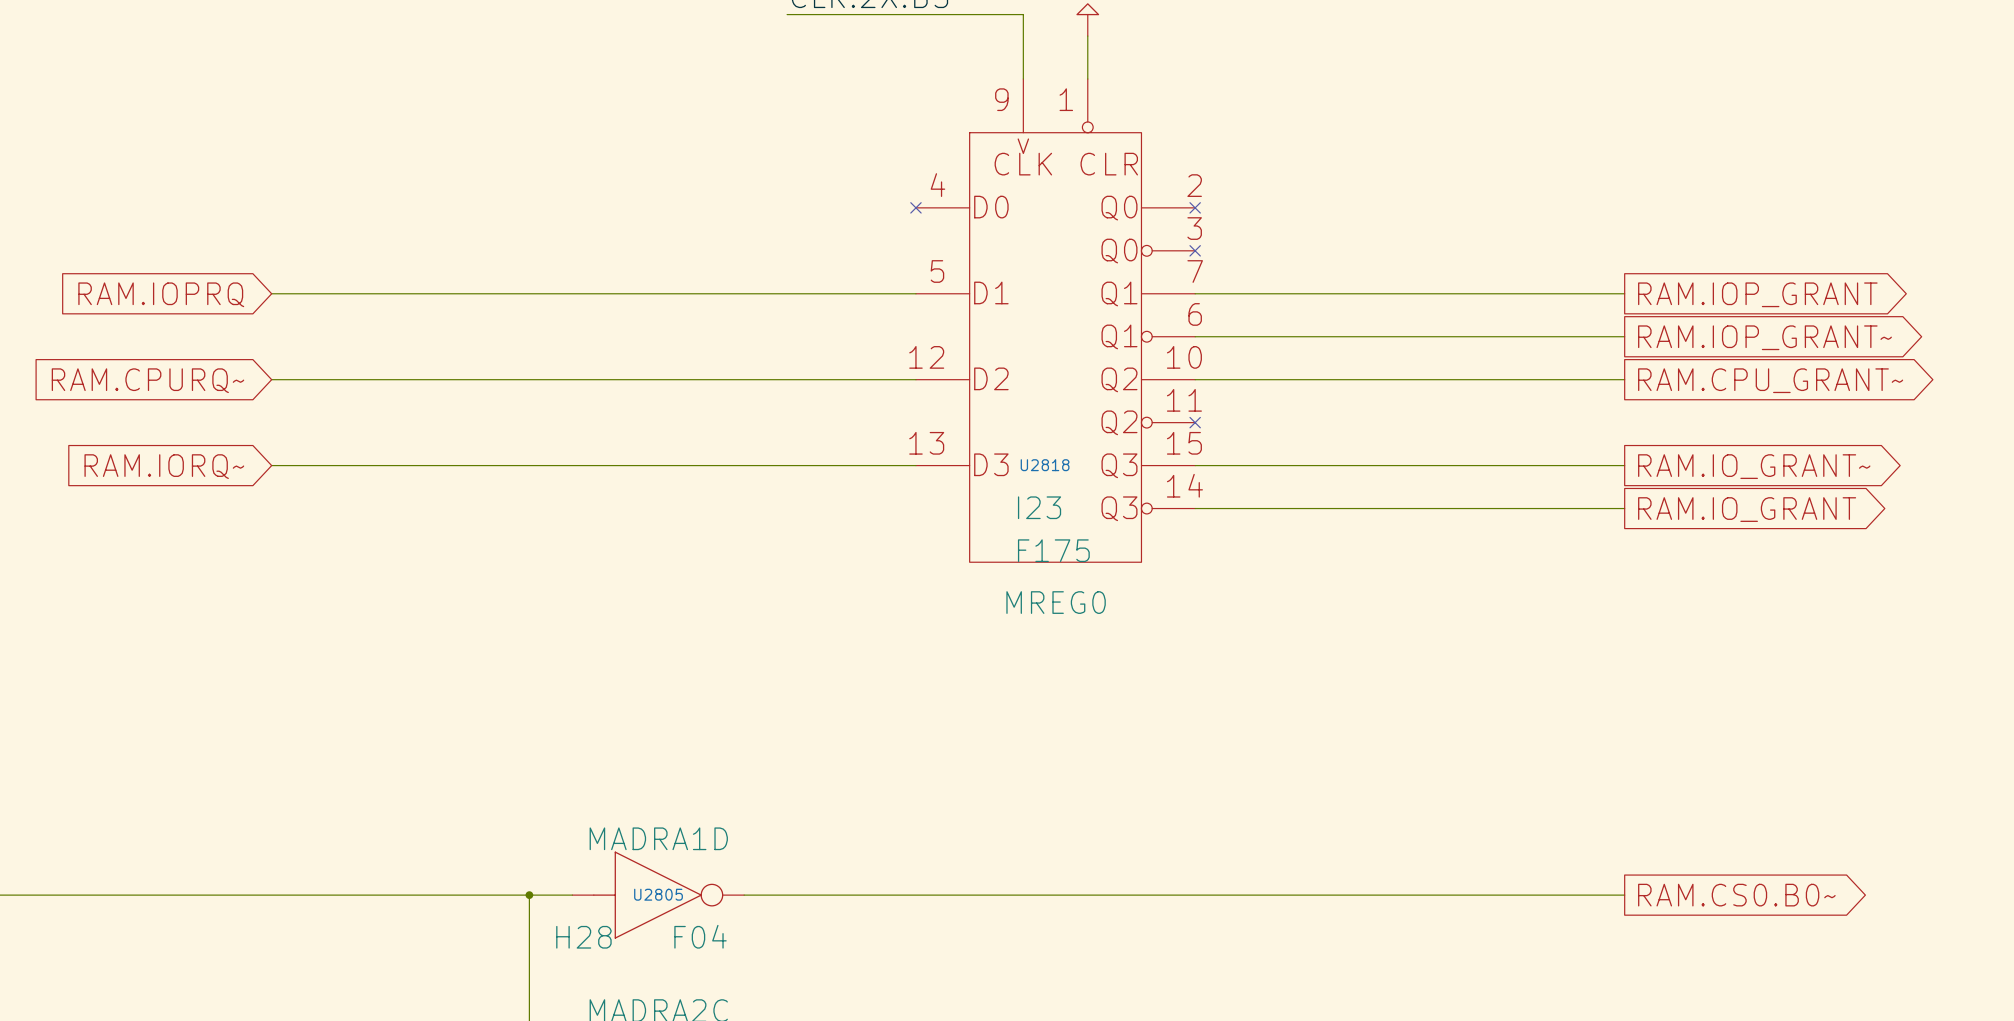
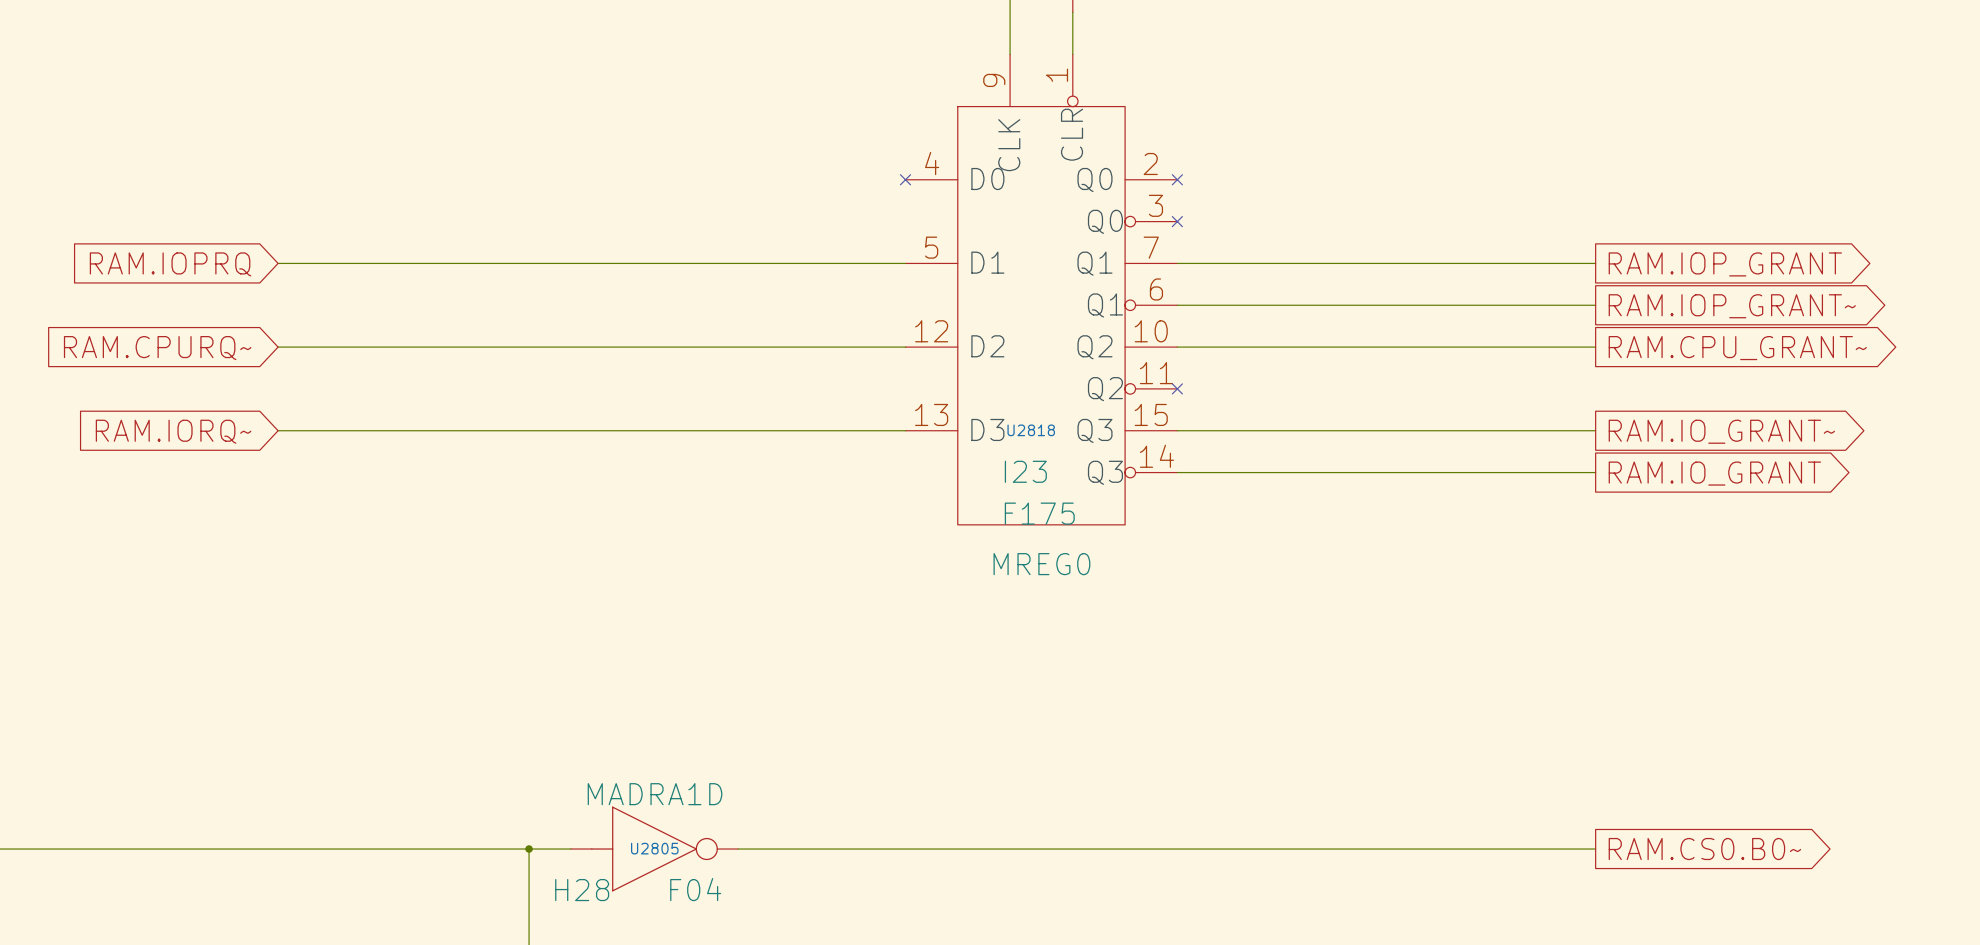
U2818 symbol: [915, 79, 1196, 563] -> [905, 54, 1178, 525]

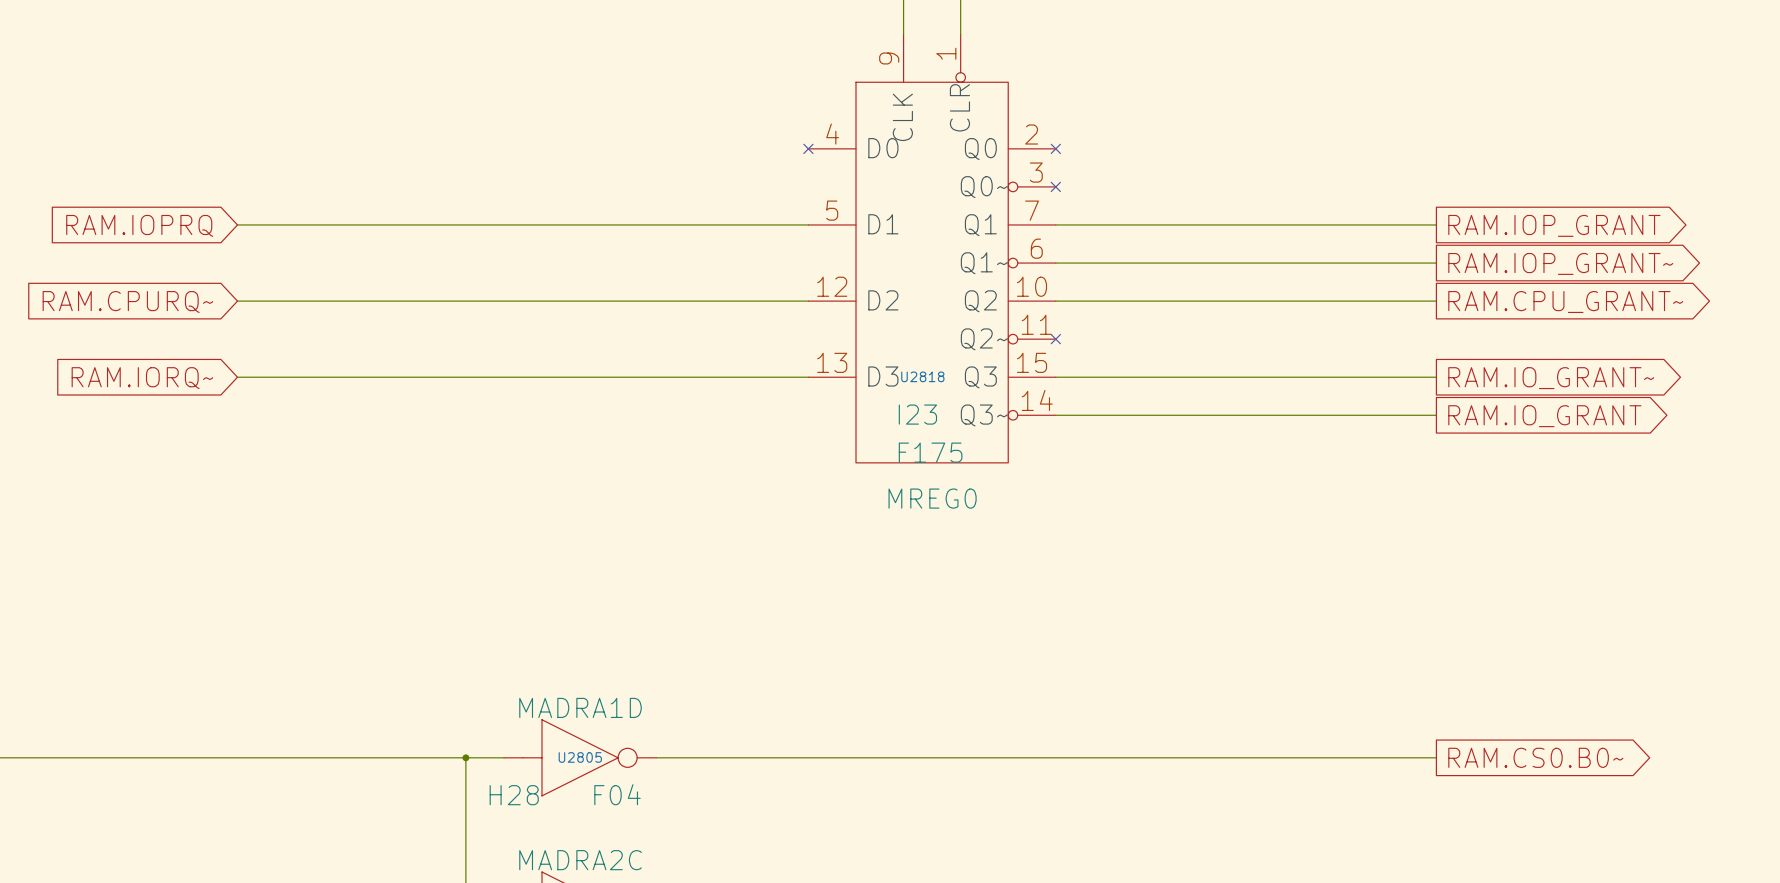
U2818 pin name: Q0 (1105, 221) -> Q0~ (984, 187)
U2818 pin name: Q1 (1105, 305) -> Q1~ (984, 263)
U2818 pin name: Q2 (1105, 389) -> Q2~ (984, 339)
U2818 pin name: Q3 (1105, 472) -> Q3~ (984, 415)

